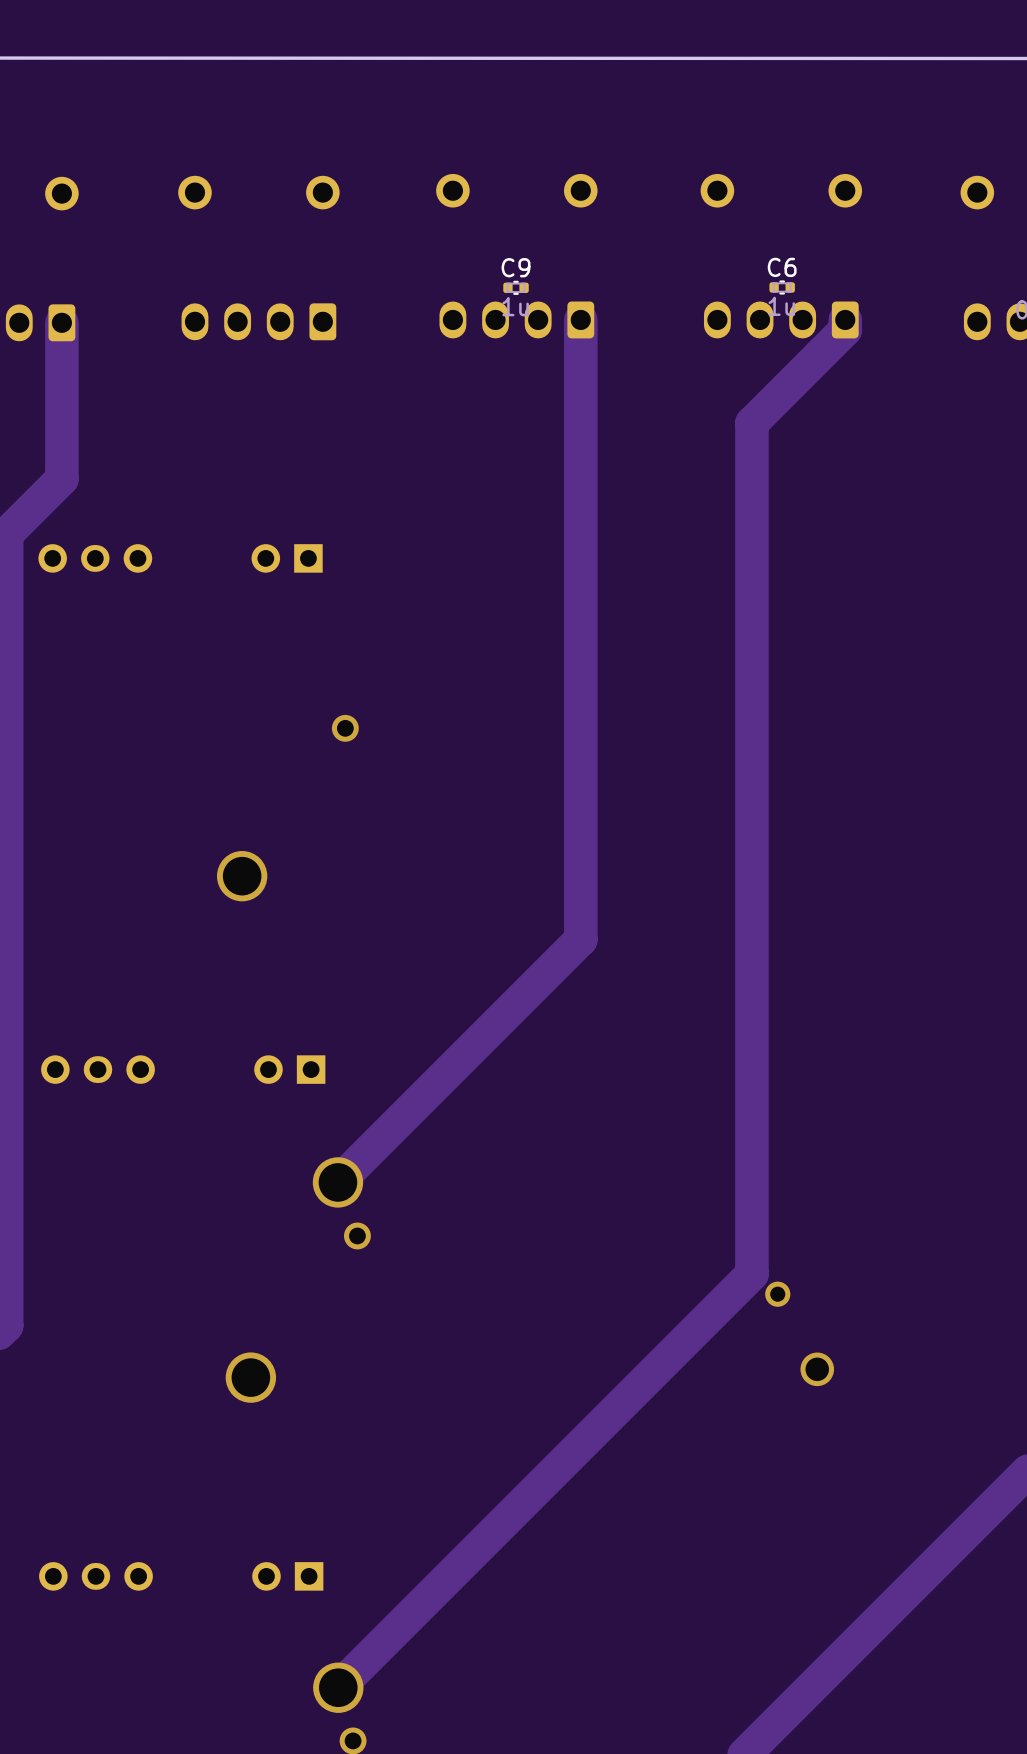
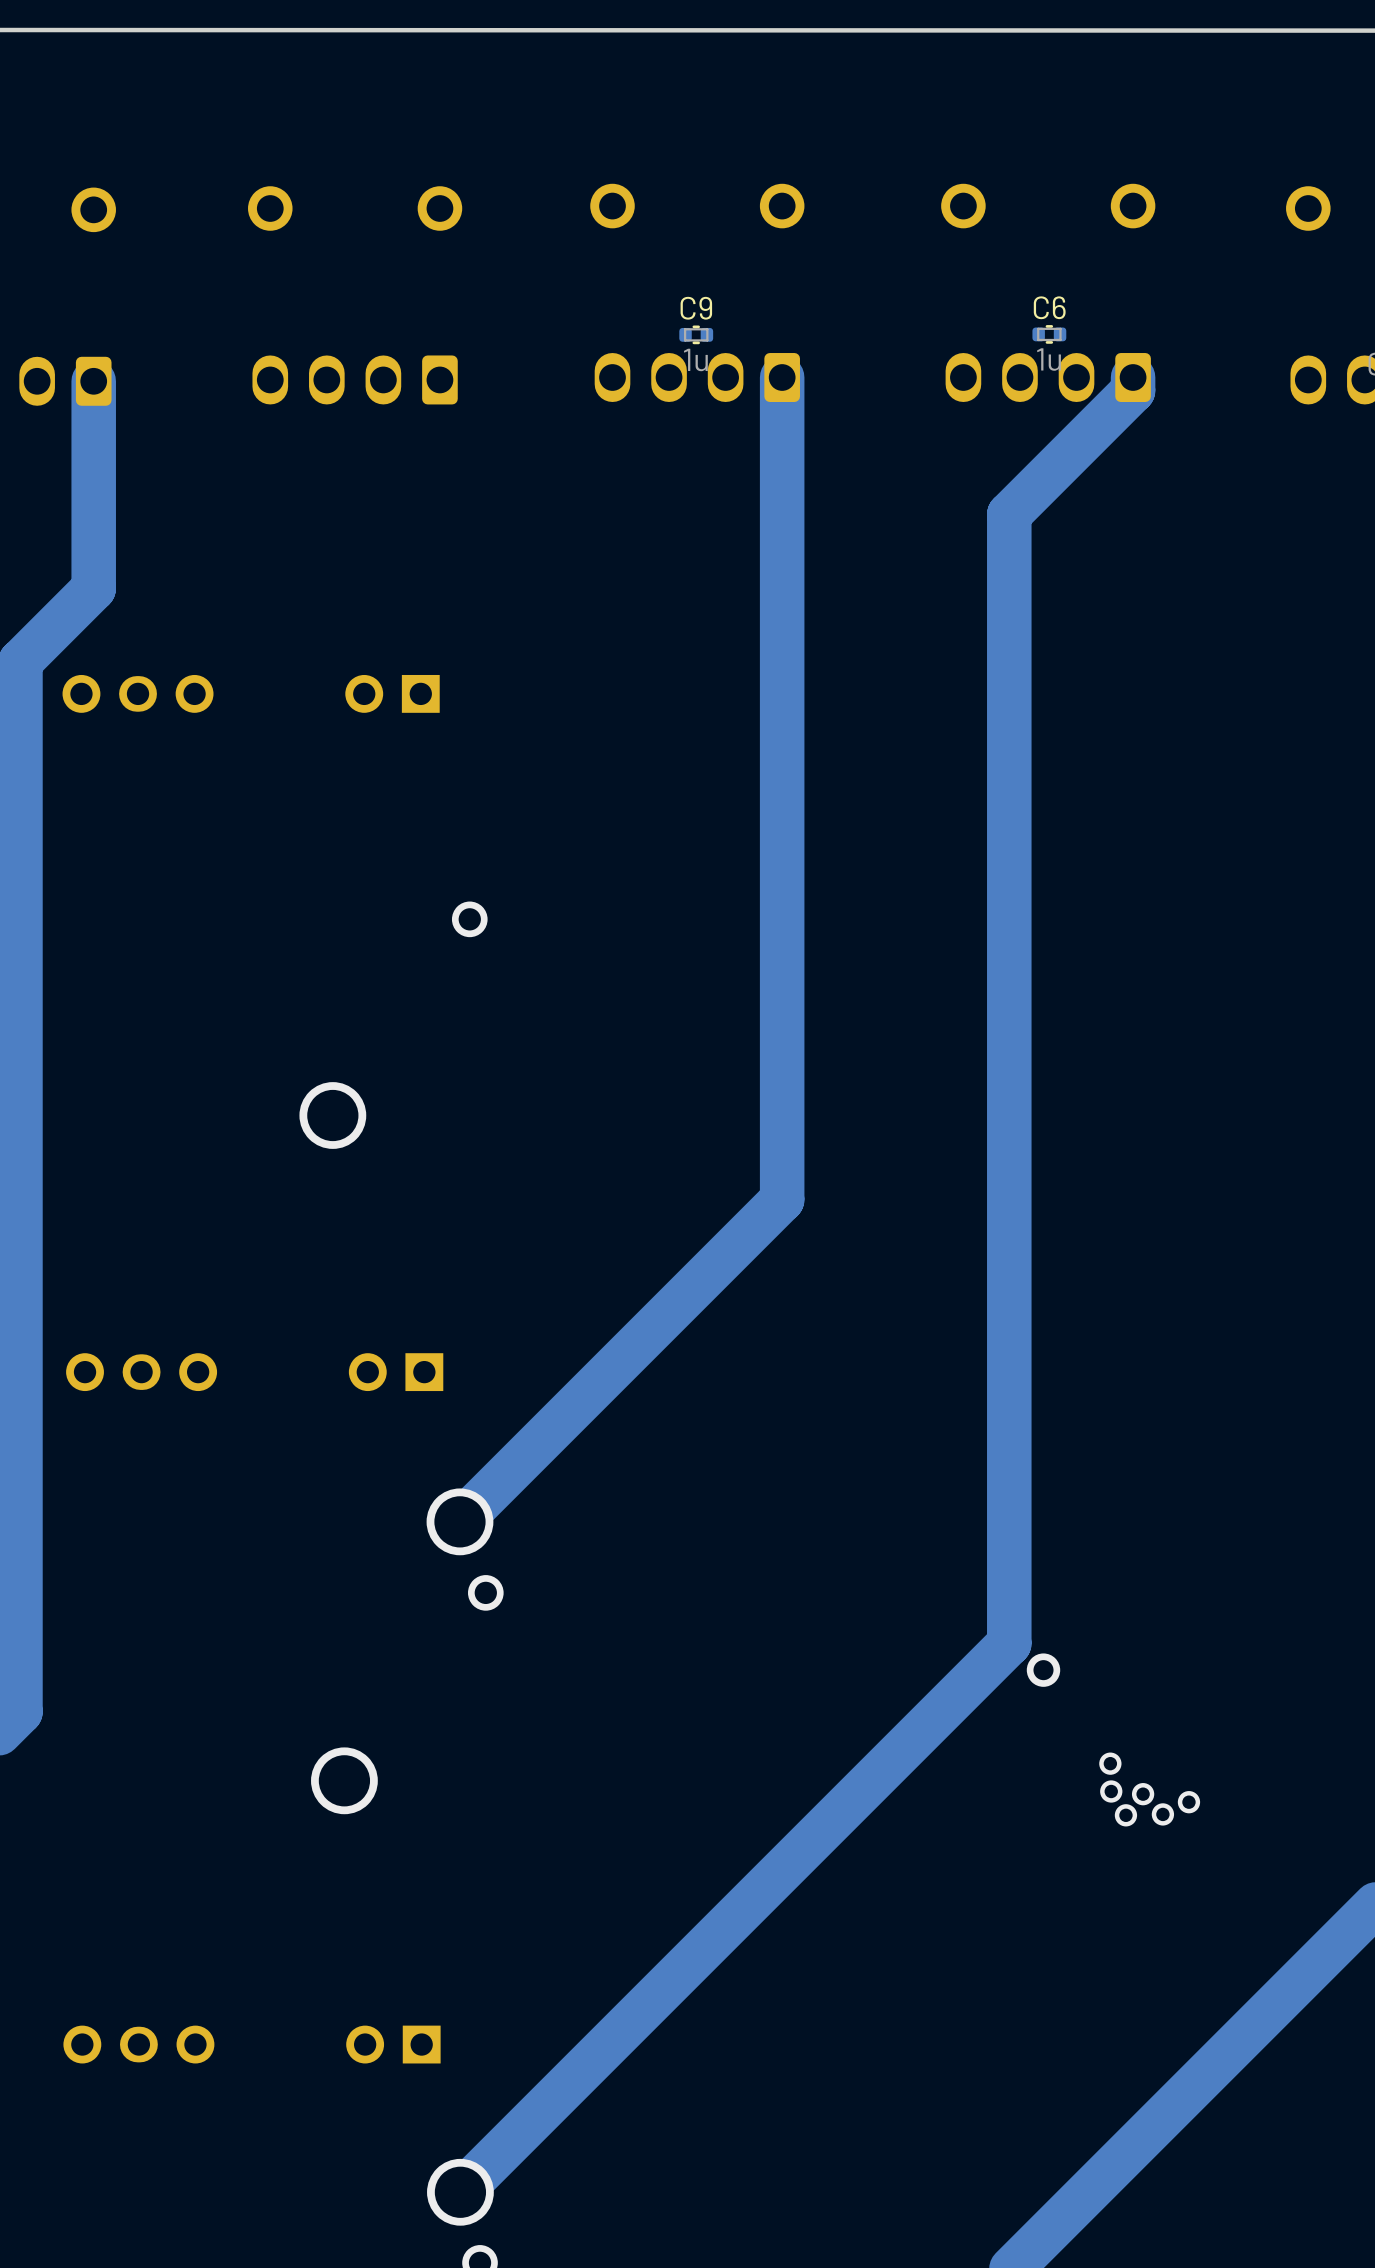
via: none -> (1110, 1763)
via: (817, 1369) -> none
via: none -> (1111, 1791)
via: none -> (1143, 1794)
via: none -> (1188, 1802)
via: none -> (1162, 1814)
via: none -> (1125, 1815)

